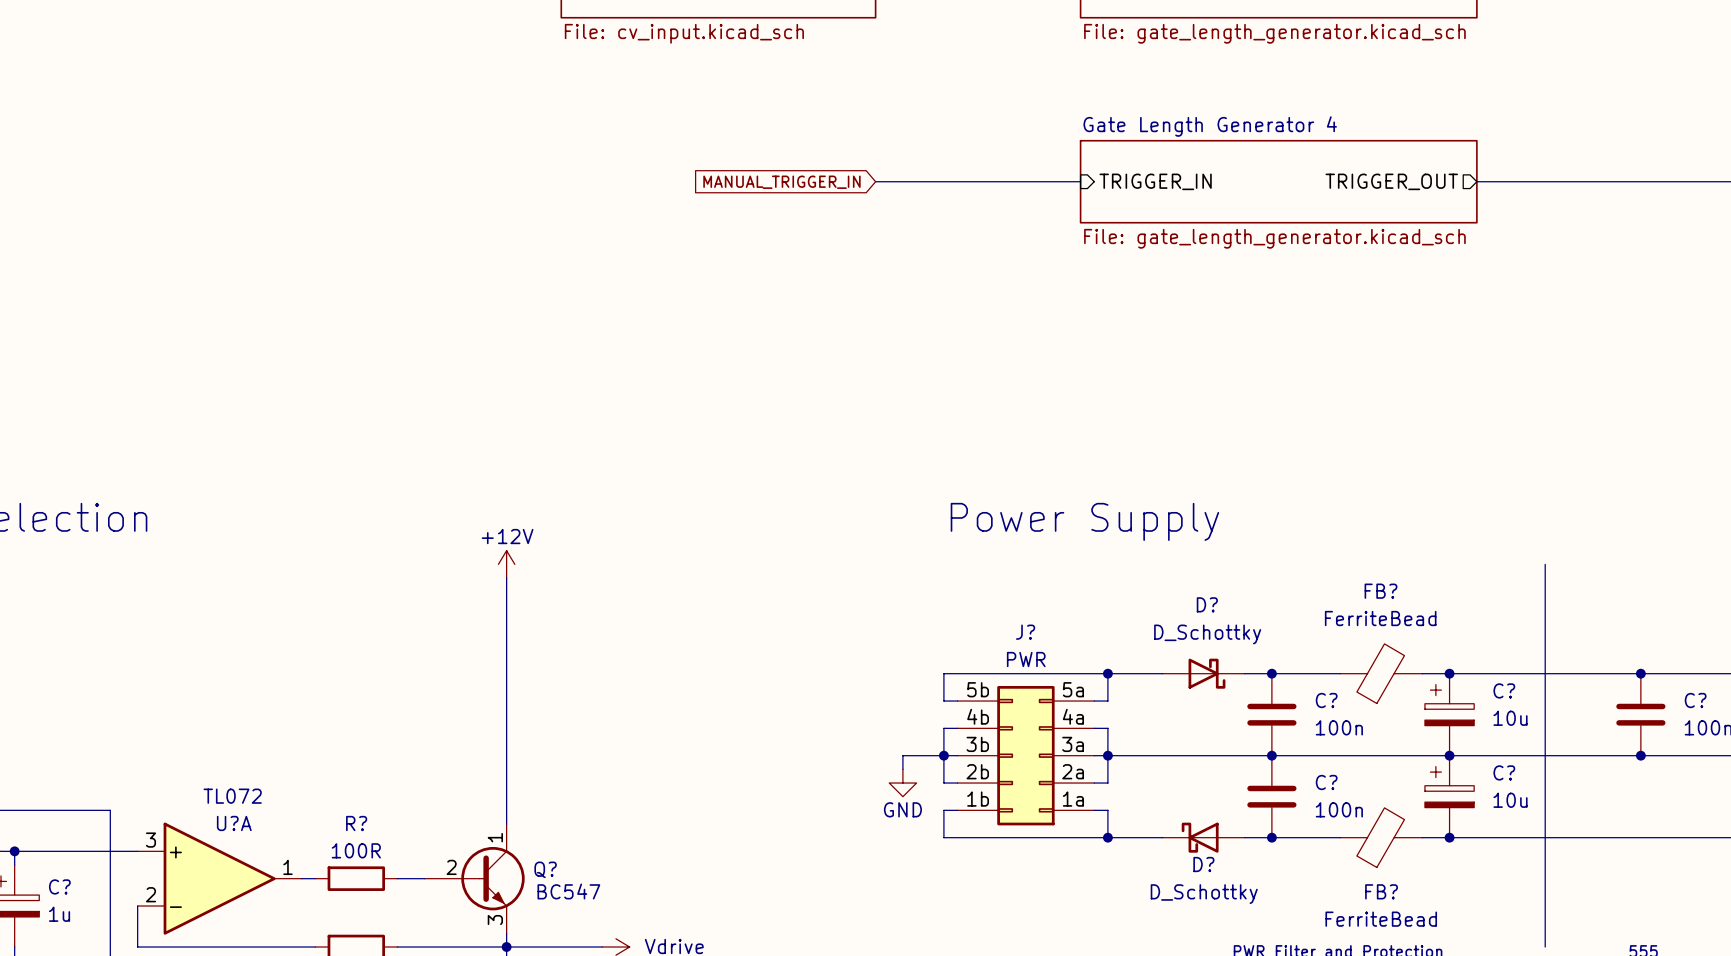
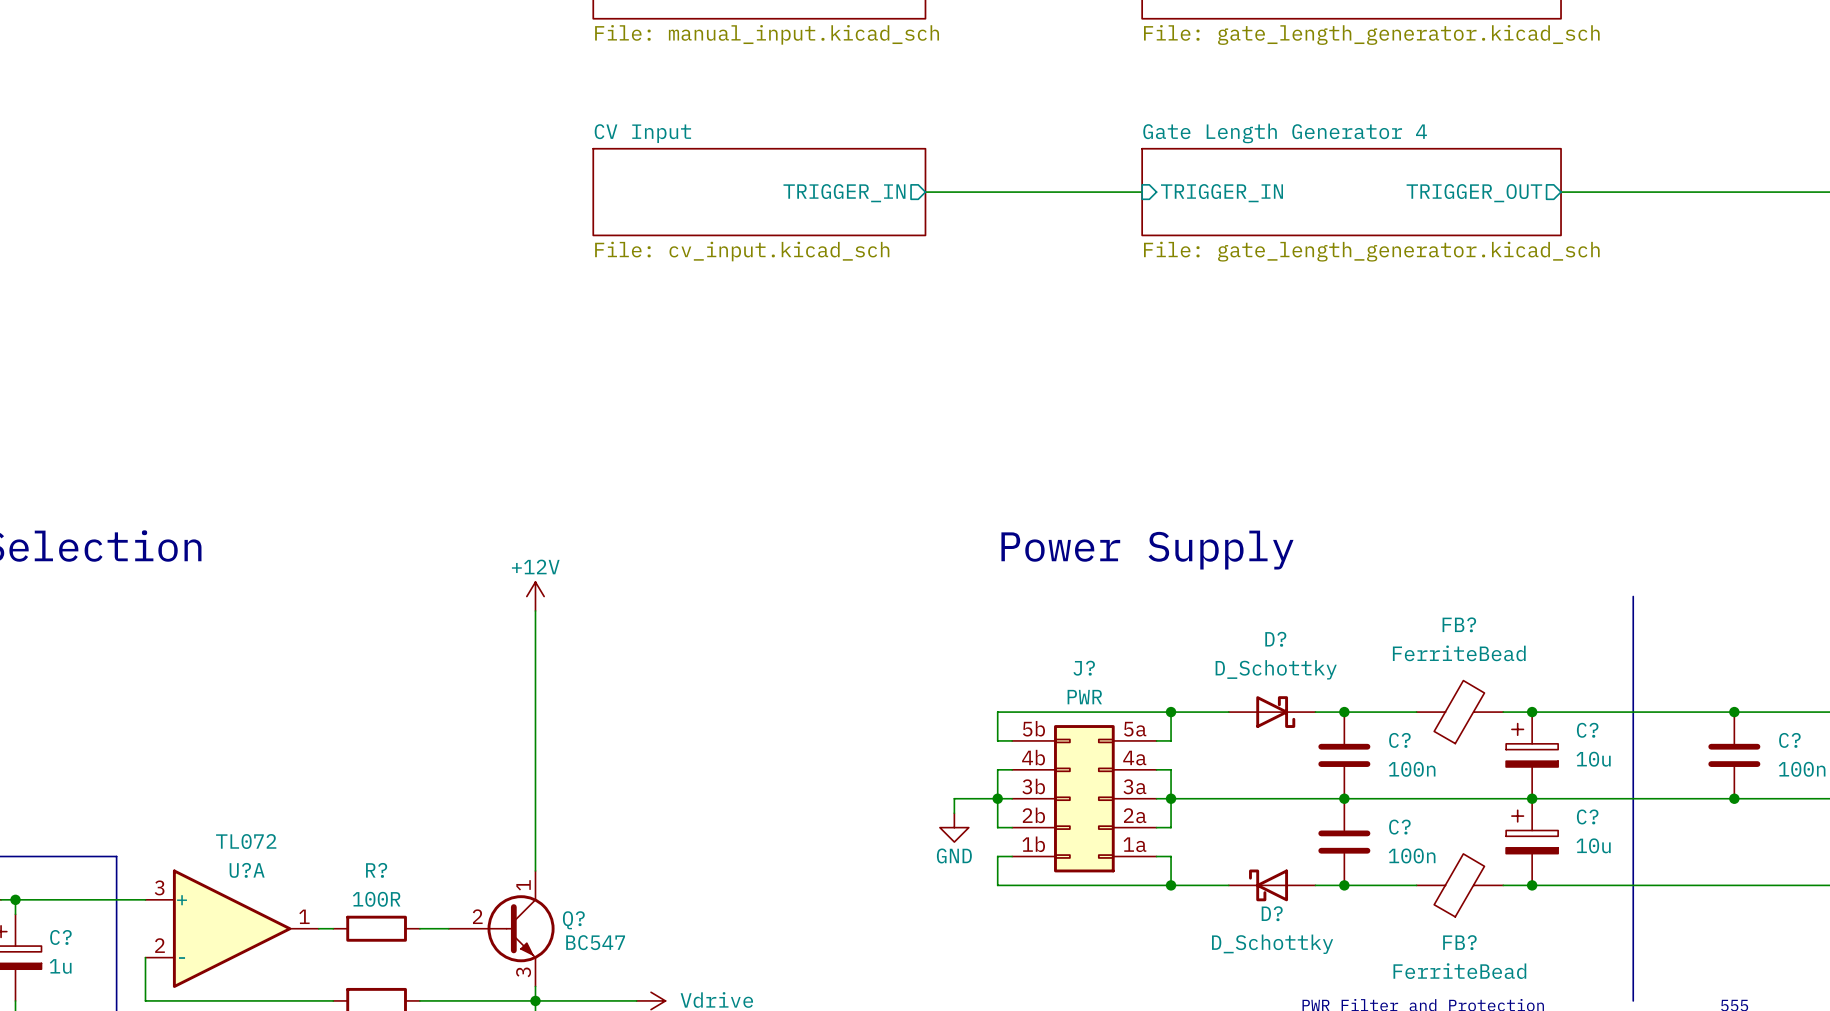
sheet value: File: cv_input.kicad_sch (684, 33) -> File: manual_input.kicad_sch (767, 34)
sheet CV Input: none -> File: cv_input.kicad_sch (759, 192)
sheet pin: none -> TRIGGER_IN (844, 193)
global label: MANUAL_TRIGGER_IN (781, 182) -> none

